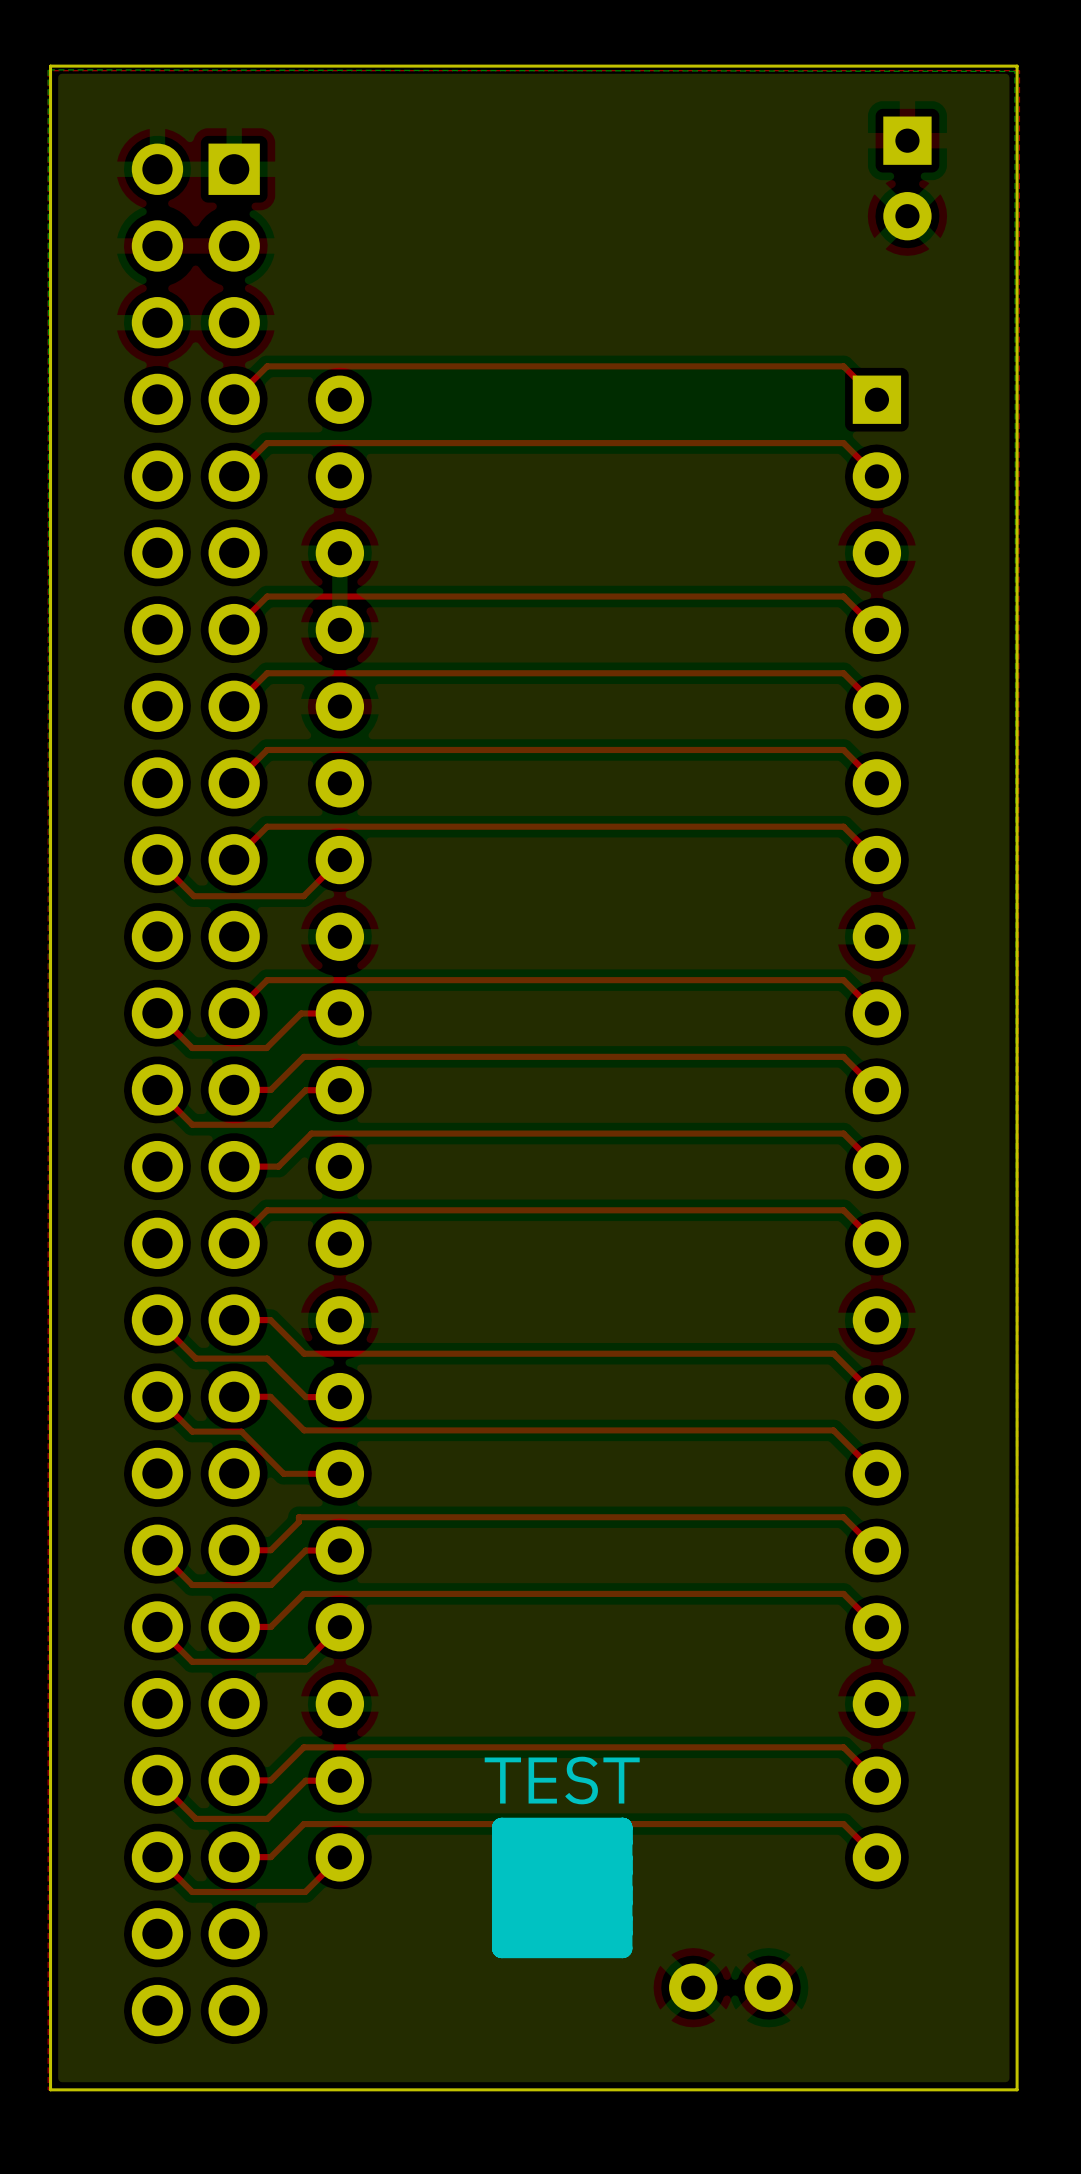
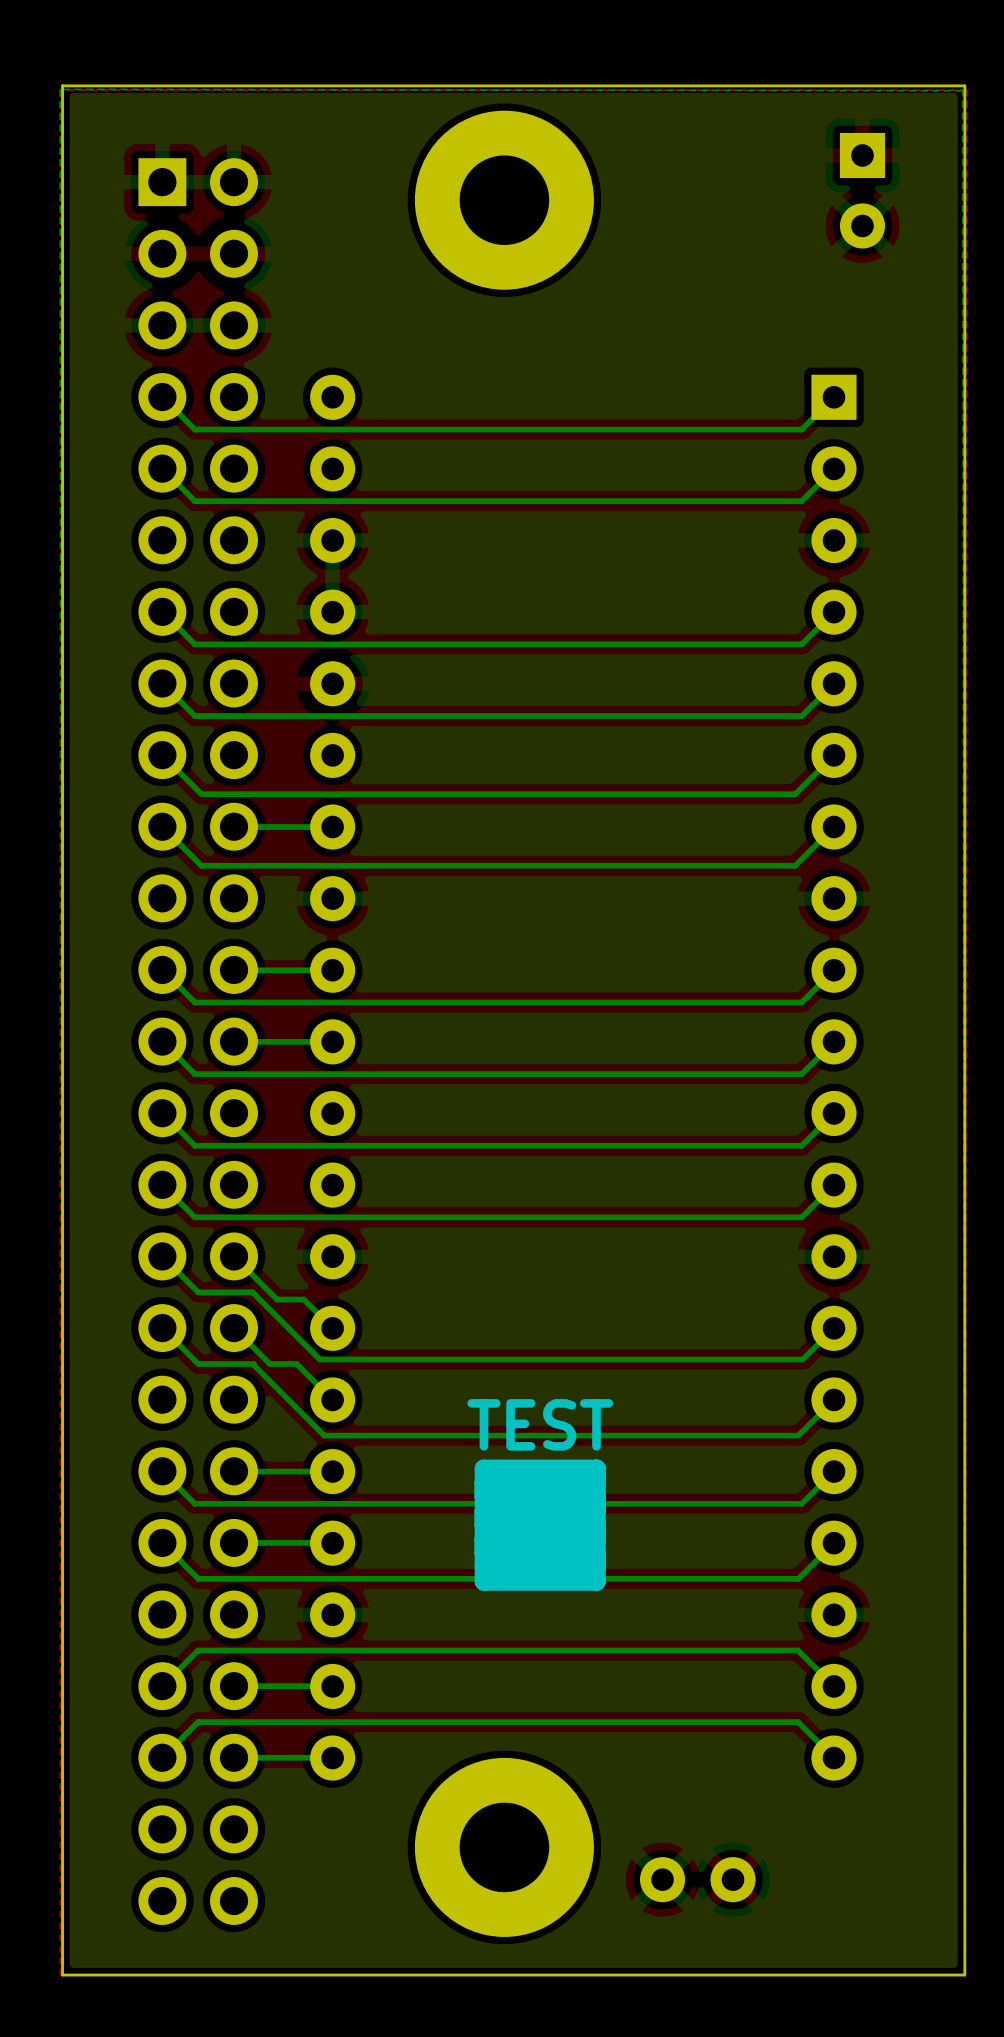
part footprint: [131, 143, 260, 2037] -> [138, 158, 258, 1925]
part: none -> (504, 200)
bottom track: none -> (162, 397) (194, 429) (801, 429) (833, 397)
top track: (234, 399) (267, 366) (843, 366) (876, 399) -> none
top track: (876, 476) (843, 443) (267, 443) (234, 476) -> none
bottom track: none -> (833, 468) (801, 501) (194, 501) (162, 468)
bottom track: none -> (162, 611) (194, 644) (801, 644) (833, 612)
top track: (234, 629) (267, 596) (843, 596) (876, 629) -> none
bottom track: none -> (162, 683) (194, 716) (801, 716) (833, 683)
top track: (234, 706) (267, 673) (843, 673) (876, 706) -> none
bottom track: none -> (162, 755) (201, 794) (795, 794) (833, 755)
top track: (234, 783) (267, 749) (843, 749) (876, 783) -> none
top track: (339, 860) (303, 896) (193, 896) (157, 859) -> none
bottom track: none -> (332, 827) (234, 827)
top track: (876, 860) (843, 826) (267, 826) (234, 859) -> none
bottom track: none -> (833, 827) (795, 865) (201, 865) (162, 826)
top track: (339, 1013) (301, 1013) (266, 1048) (192, 1048) (157, 1013) -> none
bottom track: none -> (332, 970) (234, 970)
top track: (876, 1013) (843, 980) (267, 980) (234, 1013) -> none
bottom track: none -> (833, 970) (801, 1002) (194, 1002) (162, 969)
top track: (157, 1089) (192, 1124) (271, 1124) (305, 1090) (339, 1090) -> none
bottom track: none -> (162, 1041) (194, 1074) (801, 1074) (833, 1041)
top track: (234, 1089) (270, 1089) (303, 1056) (843, 1056) (876, 1090) -> none
bottom track: none -> (332, 1041) (234, 1041)
top track: (876, 1166) (843, 1133) (311, 1133) (278, 1166) (234, 1166) -> none
bottom track: none -> (833, 1113) (801, 1145) (194, 1145) (162, 1113)
bottom track: none -> (162, 1184) (194, 1217) (801, 1217) (833, 1185)
top track: (234, 1243) (267, 1210) (843, 1210) (876, 1243) -> none
top track: (157, 1320) (195, 1358) (267, 1358) (305, 1397) (339, 1397) -> none
bottom track: none -> (162, 1256) (198, 1292) (252, 1292) (319, 1359) (802, 1359) (833, 1328)
top track: (234, 1320) (270, 1320) (304, 1353) (833, 1353) (876, 1397) -> none
bottom track: none -> (233, 1256) (277, 1299) (303, 1299) (332, 1328)
top track: (157, 1396) (192, 1431) (241, 1431) (283, 1473) (339, 1473) -> none
bottom track: none -> (162, 1328) (198, 1364) (253, 1364) (324, 1435) (798, 1435) (833, 1399)
top track: (234, 1396) (270, 1396) (304, 1430) (833, 1430) (876, 1473) -> none
bottom track: none -> (233, 1328) (269, 1364) (296, 1364) (332, 1399)
top track: (339, 1550) (305, 1550) (271, 1585) (192, 1585) (157, 1550) -> none
bottom track: none -> (332, 1471) (234, 1471)
top track: (876, 1550) (843, 1517) (298, 1517) (298, 1522) (270, 1550) (234, 1550) -> none
bottom track: none -> (833, 1471) (801, 1503) (194, 1503) (162, 1471)
top track: (157, 1626) (192, 1661) (305, 1661) (339, 1627) -> none
bottom track: none -> (162, 1542) (198, 1578) (798, 1578) (833, 1543)
top track: (234, 1626) (270, 1626) (303, 1593) (843, 1593) (876, 1627) -> none
bottom track: none -> (332, 1542) (233, 1542)
top track: (157, 1780) (195, 1818) (267, 1818) (305, 1780) (339, 1780) -> none
bottom track: none -> (162, 1686) (198, 1650) (798, 1650) (833, 1686)
top track: (234, 1780) (270, 1780) (303, 1747) (843, 1747) (876, 1780) -> none
bottom track: none -> (332, 1686) (233, 1686)
top track: (157, 1857) (192, 1891) (305, 1891) (339, 1857) -> none
bottom track: none -> (162, 1757) (198, 1722) (798, 1722) (833, 1758)
top track: (234, 1857) (270, 1857) (303, 1824) (843, 1824) (876, 1857) -> none
bottom track: none -> (332, 1757) (233, 1757)
TEST position: (562, 1887) -> (540, 1525)
part: none -> (504, 1847)

